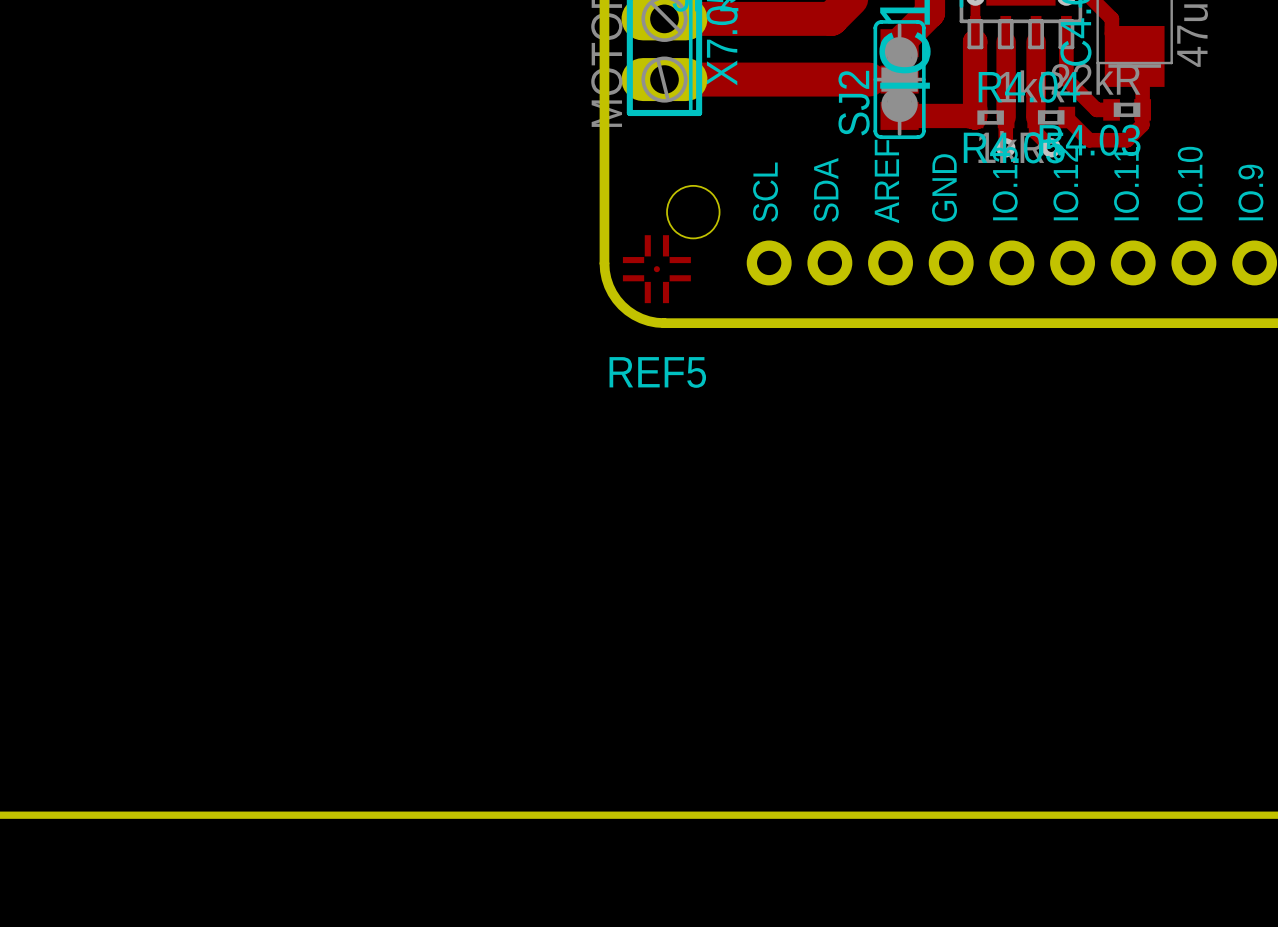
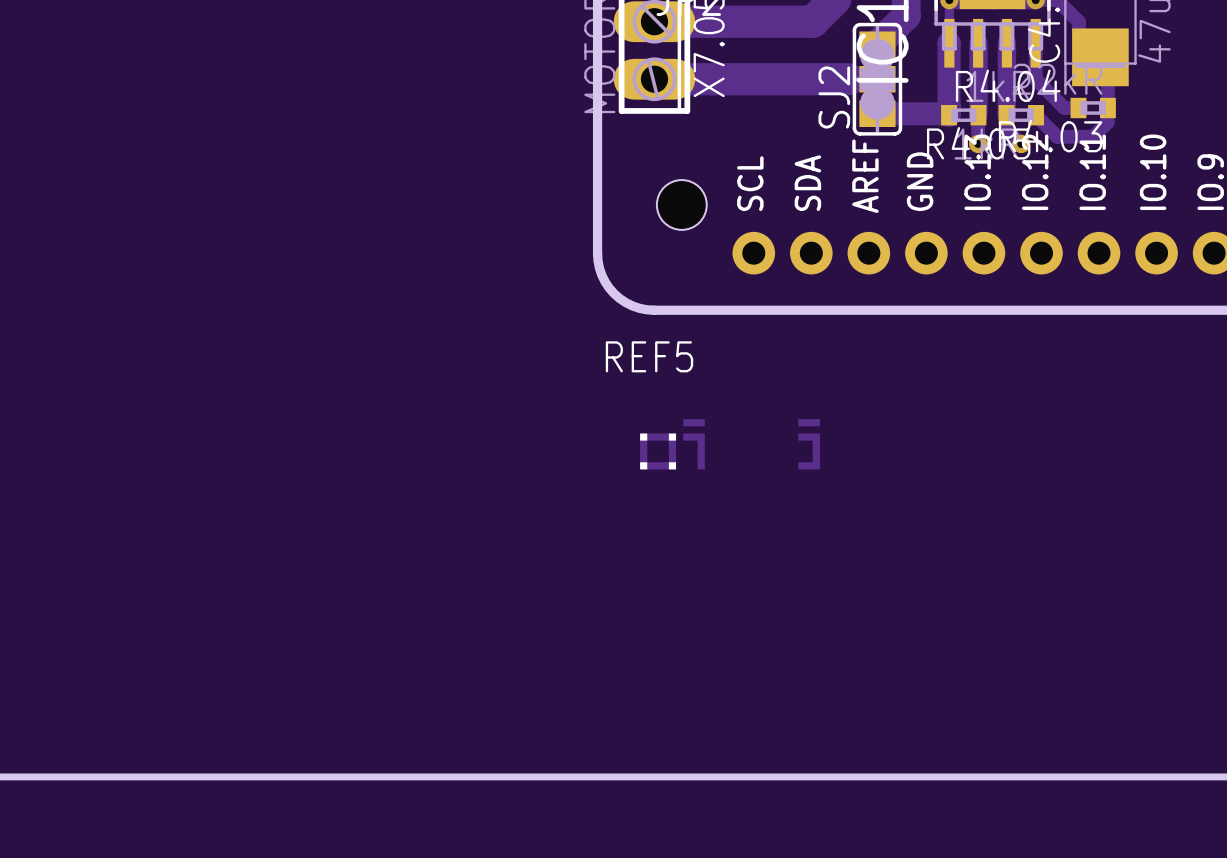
drawing: [622, 235, 691, 304] -> none
drawing: none -> [640, 419, 820, 470]

